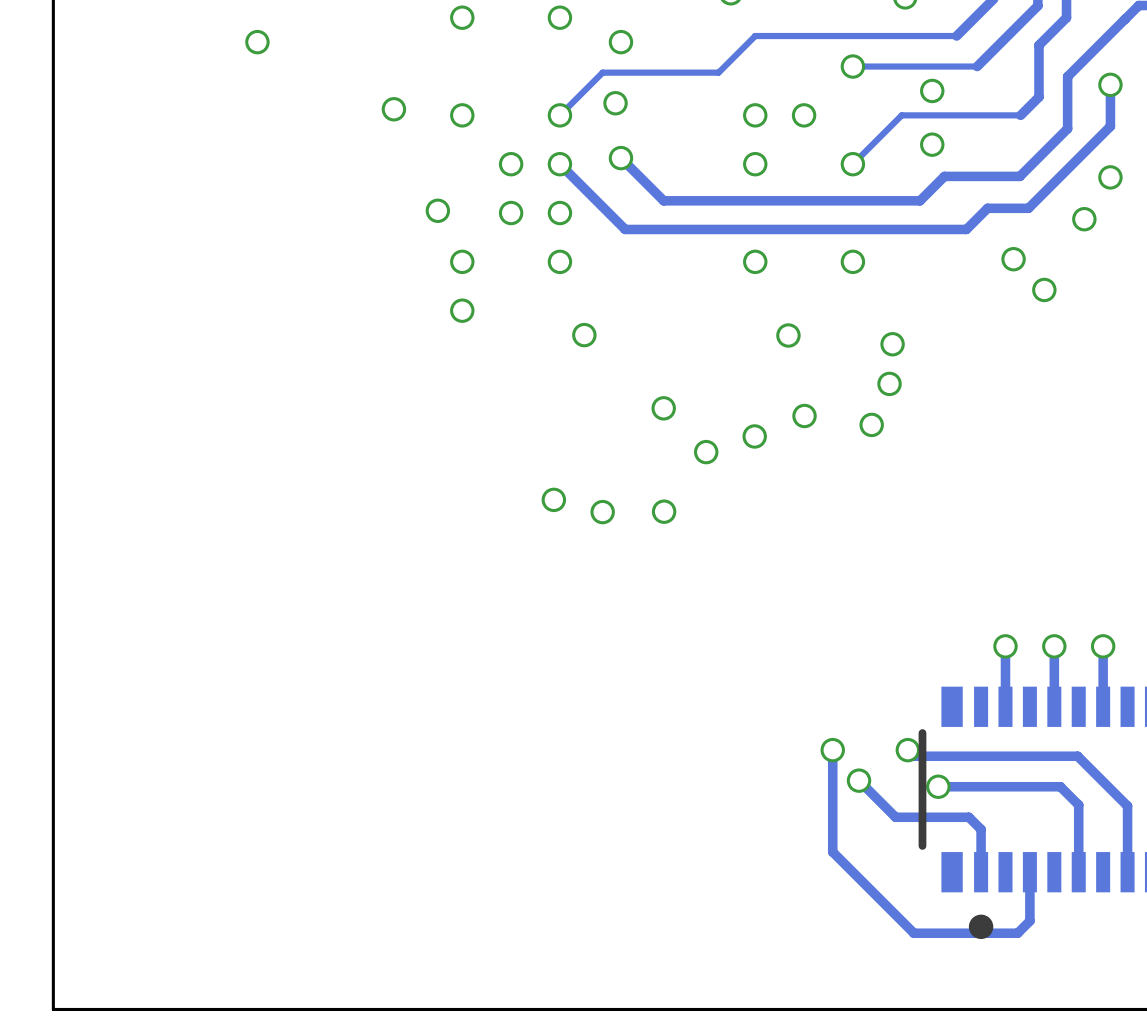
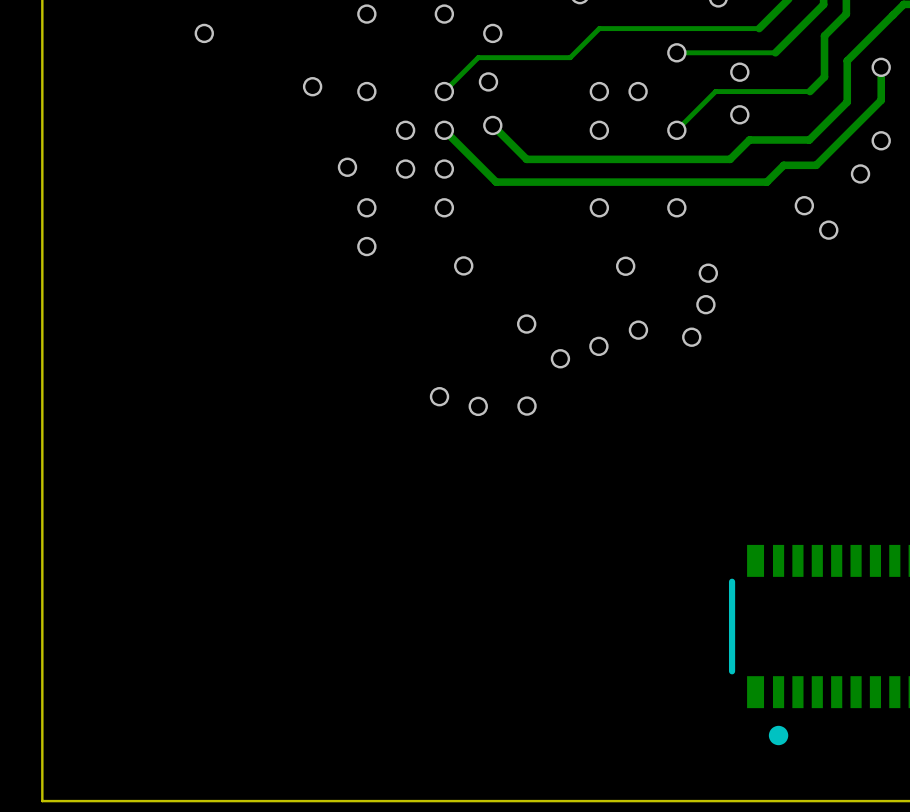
track: (1005, 646) (1005, 706) -> none
via: (1005, 646) -> none
track: (1054, 646) (1054, 706) -> none
via: (1054, 646) -> none
track: (1103, 646) (1103, 706) -> none
via: (1103, 646) -> none
track: (832, 750) (832, 852) (913, 933) (1017, 933) (1029, 921) (1029, 872) -> none
via: (832, 750) -> none
track: (907, 750) (913, 756) (1077, 756) (1127, 806) (1127, 872) -> none
via: (907, 750) -> none
track: (859, 780) (895, 817) (968, 817) (981, 829) (981, 872) -> none
via: (859, 780) -> none
track: (938, 786) (1060, 786) (1078, 805) (1078, 872) -> none
via: (938, 786) -> none

